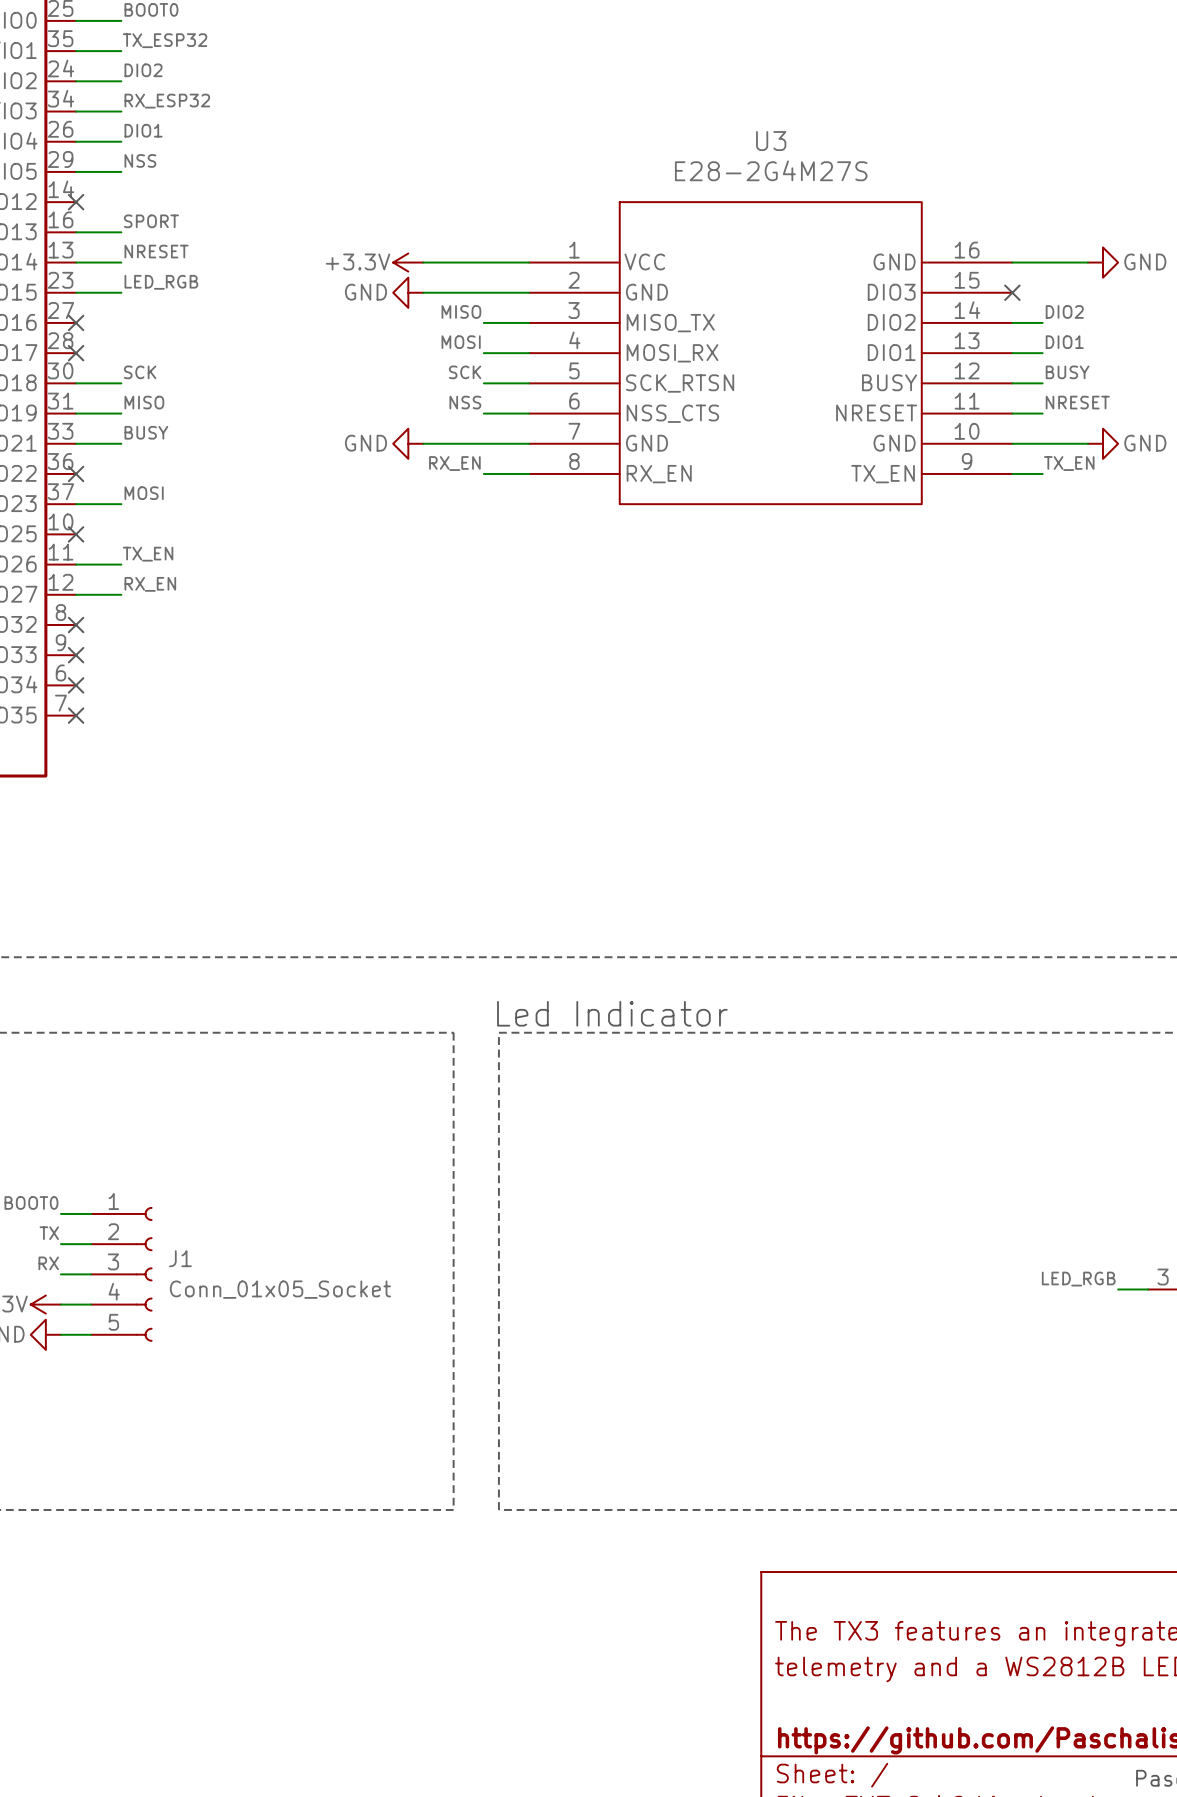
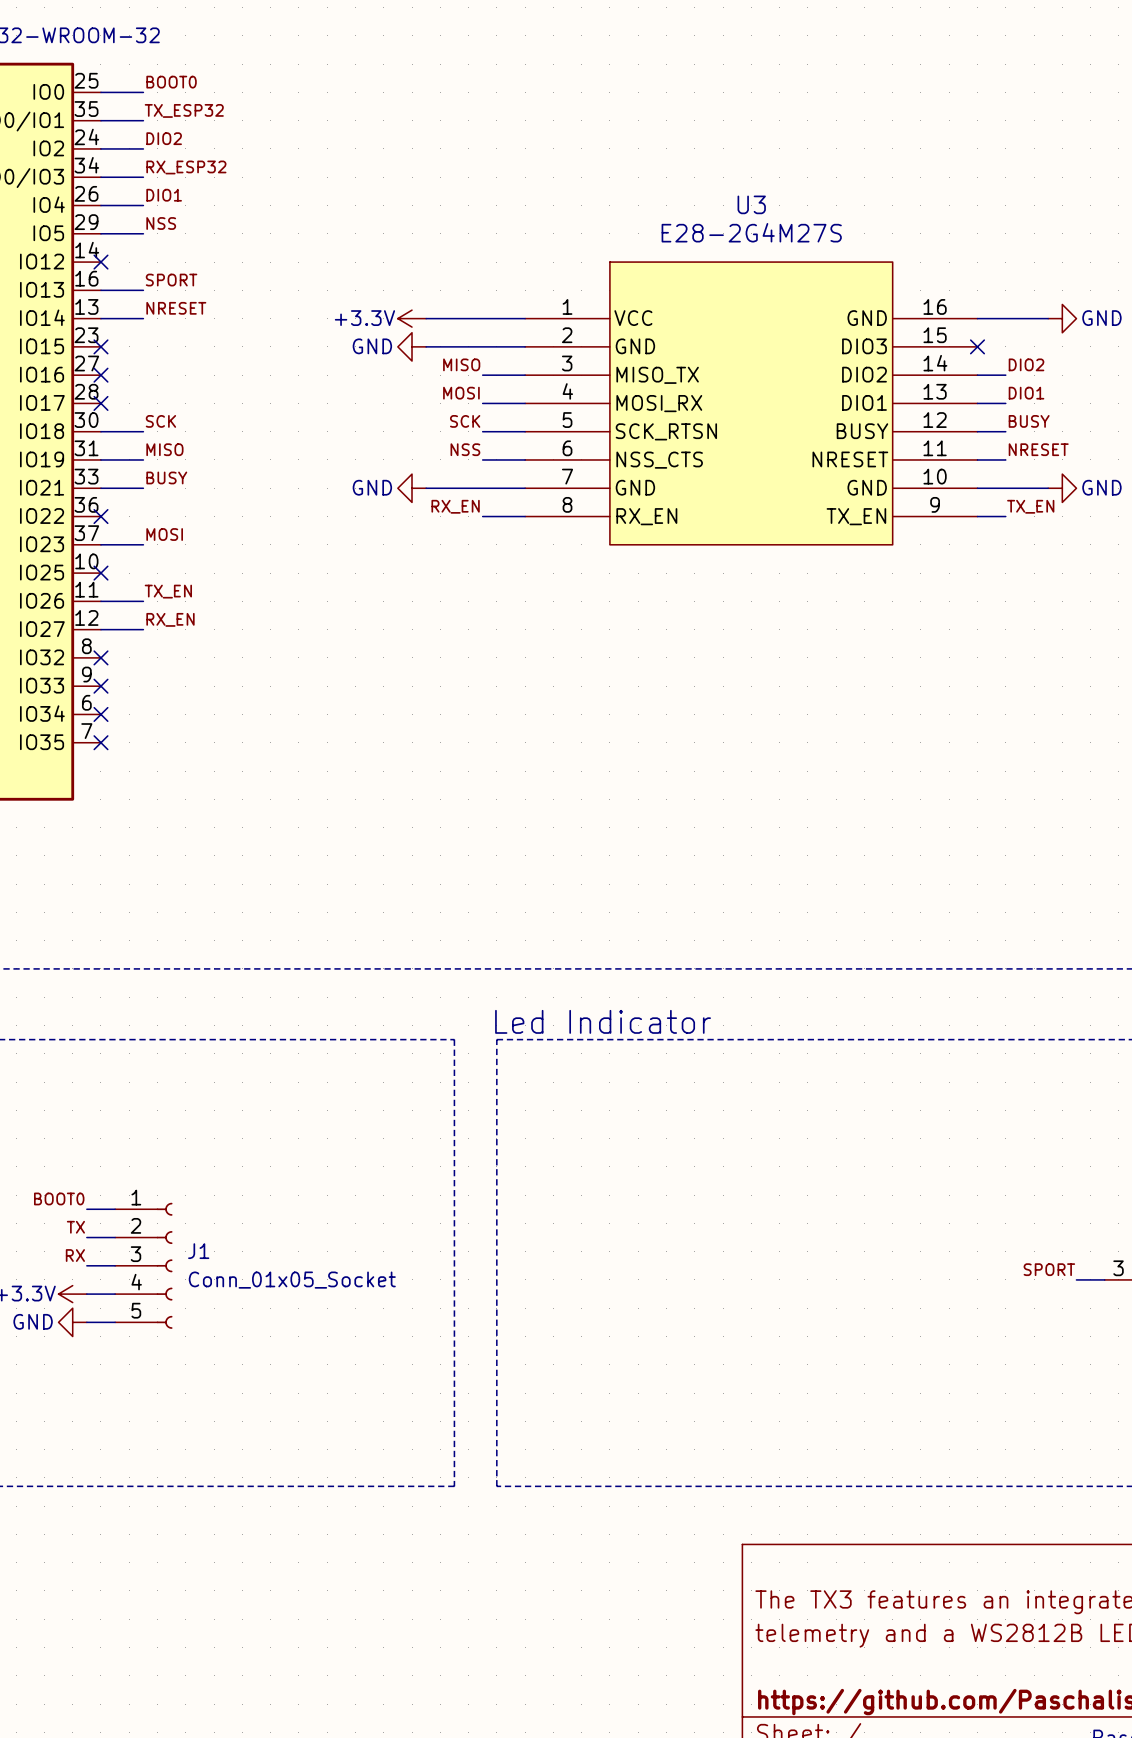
label: LED_RGB (161, 282) -> none
wire: (76, 292) (121, 292) -> none
no-connect mark: none -> (100, 346)
label: LED_RGB (1078, 1279) -> SPORT (1049, 1269)

